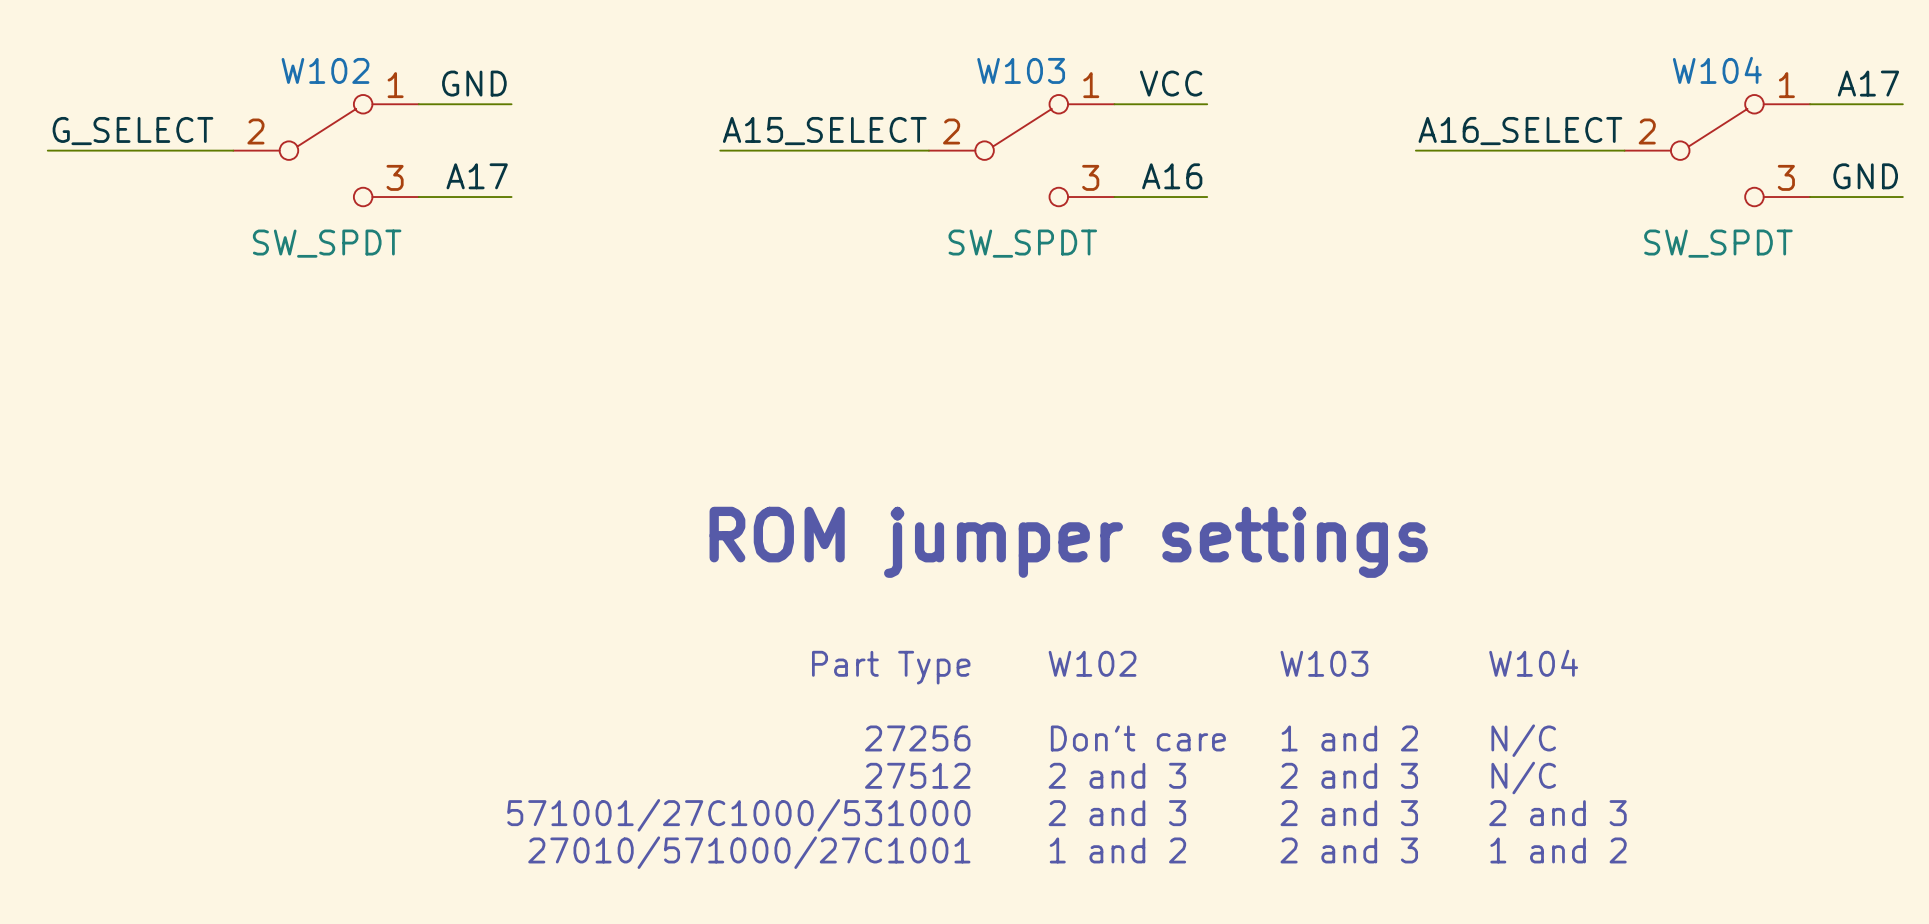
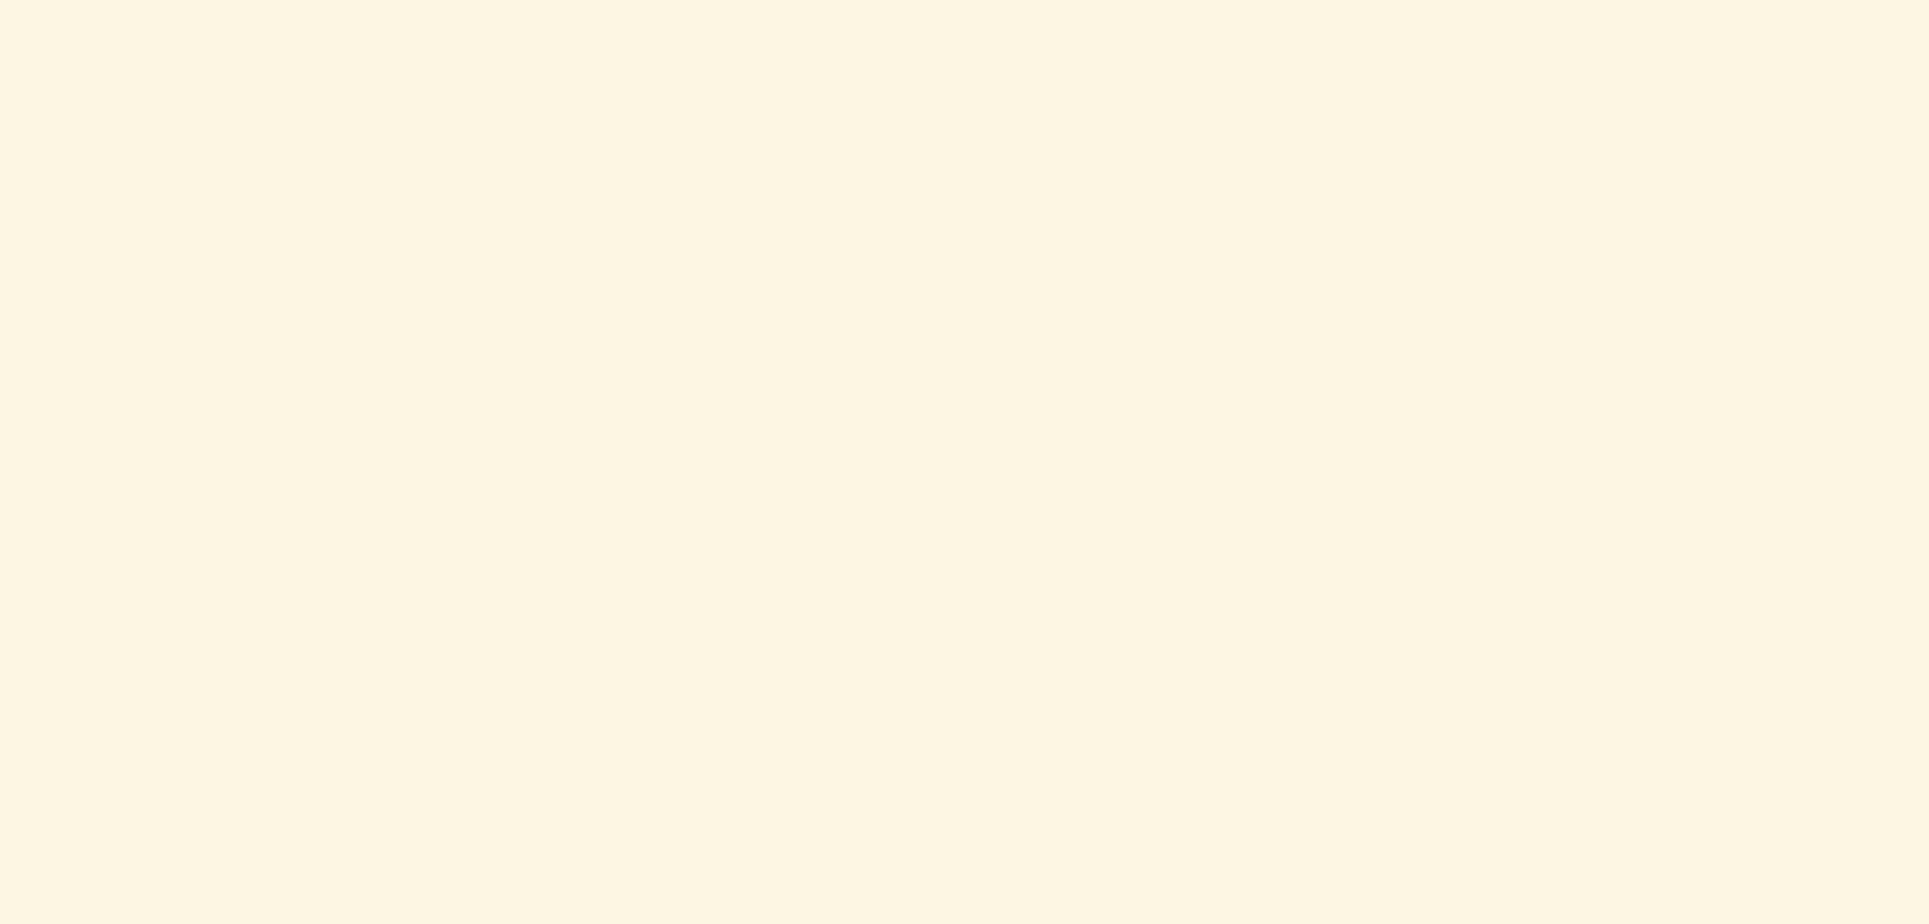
label: GND (474, 83) -> none
label: VCC (1171, 83) -> none
label: A17 (1868, 83) -> none
wire: (418, 104) (511, 104) -> none
wire: (1114, 104) (1207, 104) -> none
wire: (1810, 104) (1902, 104) -> none
label: G_SELECT (132, 131) -> none
label: A15_SELECT (824, 131) -> none
label: A16_SELECT (1520, 131) -> none
wire: (47, 150) (233, 150) -> none
W102: SW_SPDT (326, 150) -> none
wire: (720, 150) (928, 150) -> none
W103: SW_SPDT (1021, 150) -> none
wire: (1415, 150) (1624, 150) -> none
W104: SW_SPDT (1717, 150) -> none
label: A17 (477, 176) -> none
label: A16 (1172, 176) -> none
label: GND (1865, 176) -> none
wire: (418, 197) (511, 197) -> none
wire: (1114, 197) (1207, 197) -> none
wire: (1810, 197) (1902, 197) -> none
text: ROM jumper settings (1068, 542) -> none
text: W102 (1092, 663) -> none
text: W103 (1324, 663) -> none
text: W104 (1533, 663) -> none
text: Part Type (891, 667) -> none
text: 27256 (917, 738) -> none
text: Don't care (1138, 738) -> none
text: 1 and 2 (1349, 738) -> none
text: N/C (1523, 740) -> none
text: 27512 (917, 775) -> none
text: 2 and 3 (1117, 775) -> none
text: 2 and 3 (1349, 775) -> none
text: N/C (1523, 778) -> none
text: 2 and 3 (1117, 813) -> none
text: 2 and 3 (1349, 813) -> none
text: 2 and 3 (1557, 813) -> none
text: 571001/27C1000/531000 (738, 815) -> none
text: 1 and 2 (1117, 850) -> none
text: 2 and 3 (1349, 850) -> none
text: 1 and 2 (1558, 850) -> none
text: 27010/571000/27C1001 (749, 852) -> none

